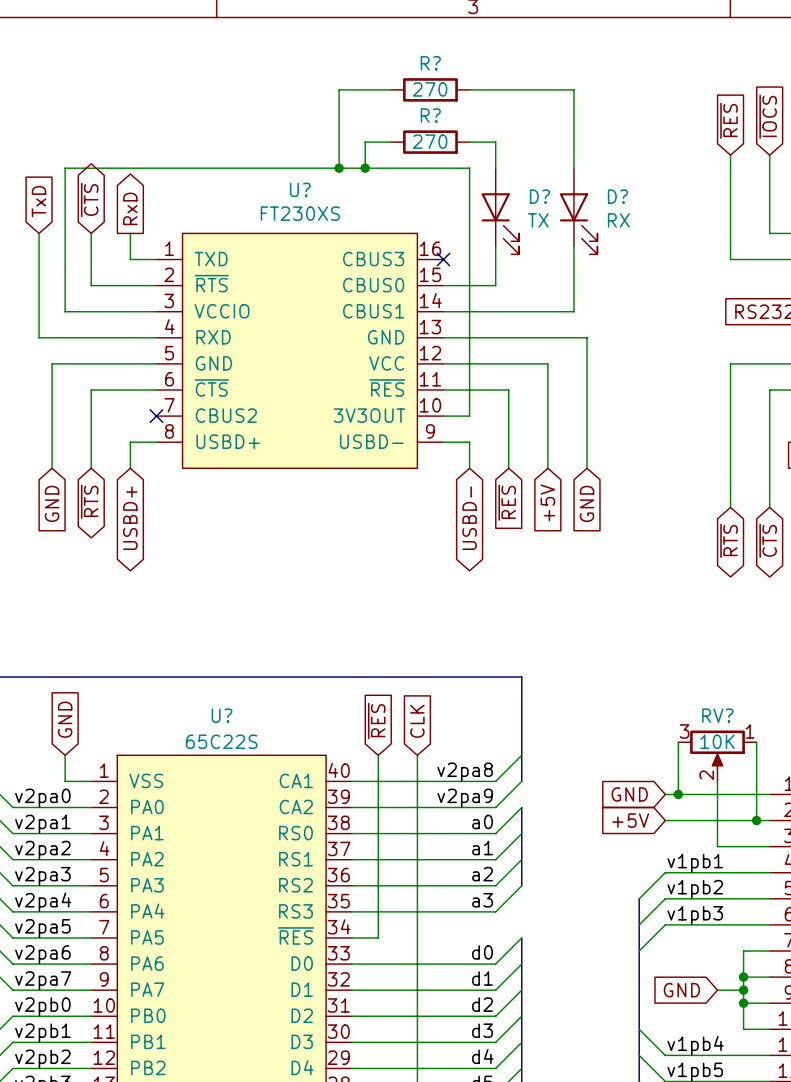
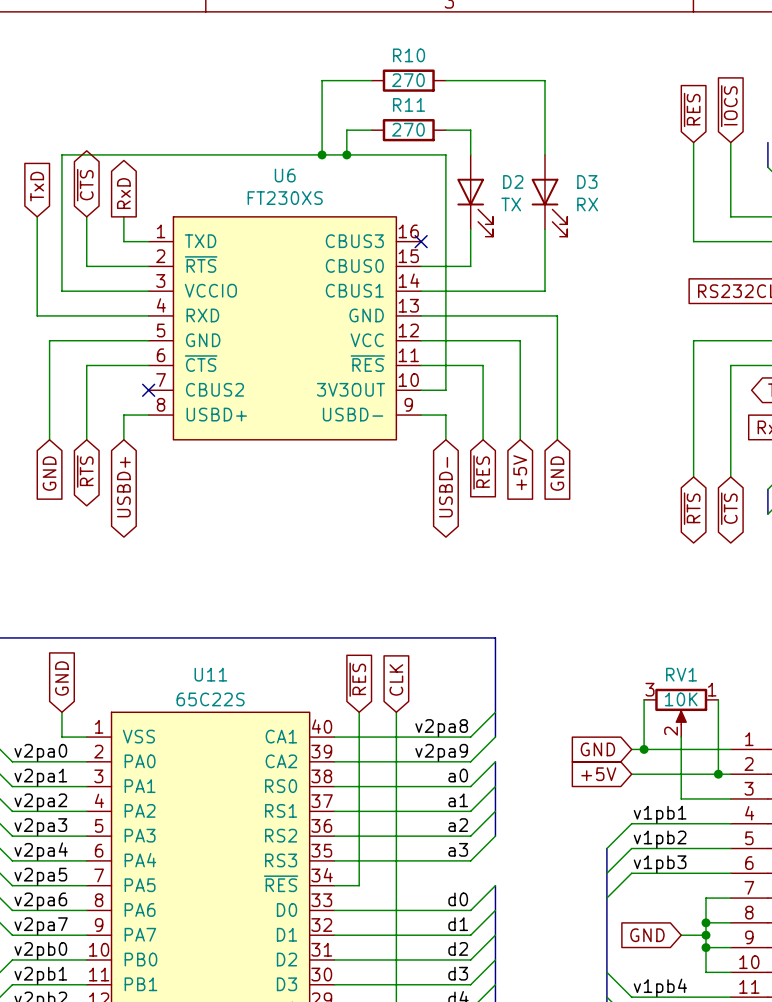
R? name: R? (430, 63) -> R10 (409, 55)
R? name: R? (430, 115) -> R11 (409, 104)
U? name: U? (300, 189) -> U6 (285, 175)
D? name: D? (539, 196) -> D2 (513, 181)
D? name: D? (617, 196) -> D3 (587, 181)
U? name: U? (222, 715) -> U11 (210, 674)
RV? name: RV? (717, 715) -> RV1 (681, 674)

